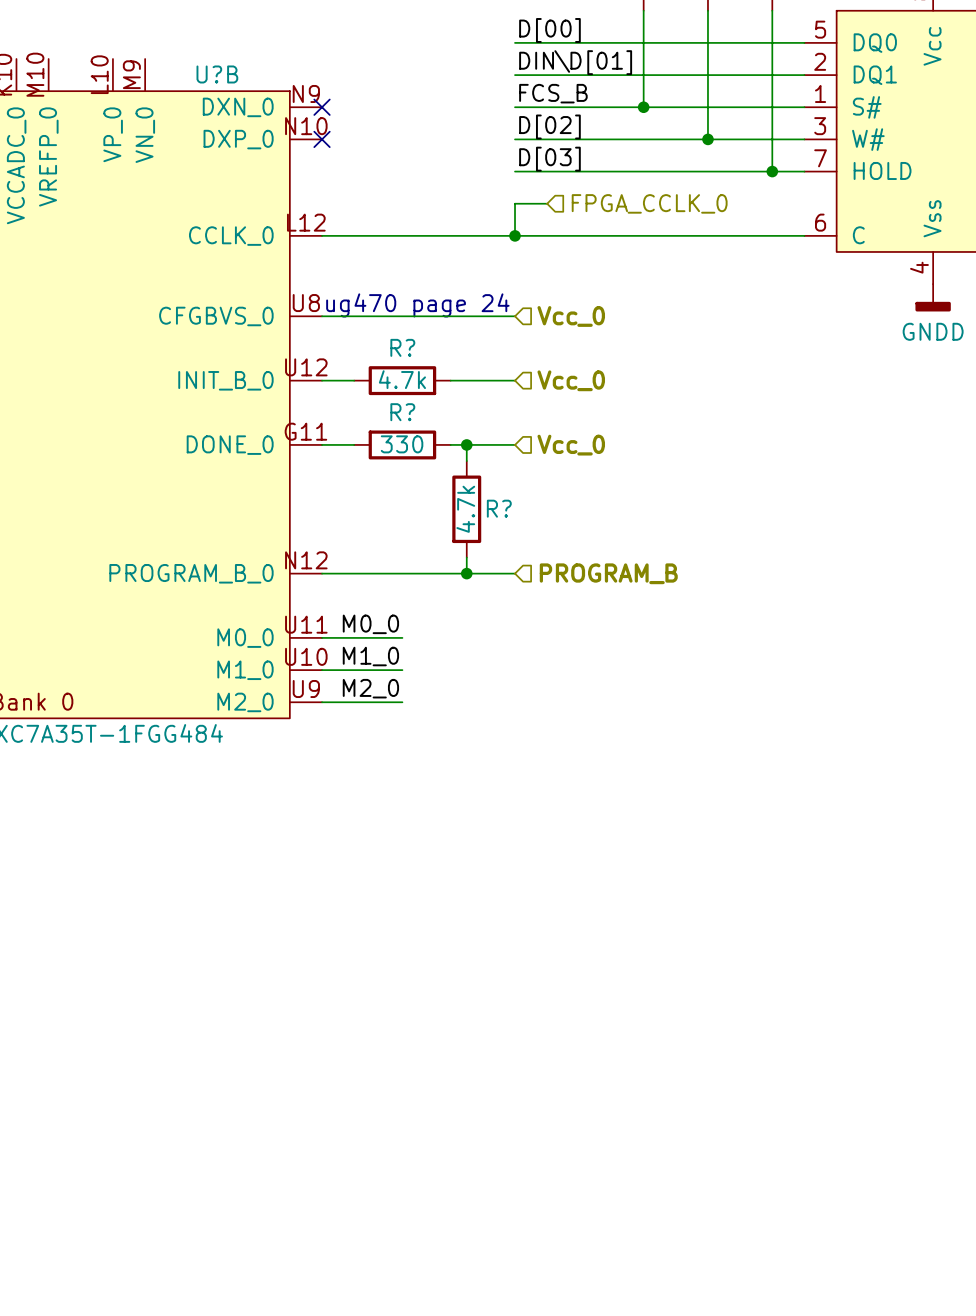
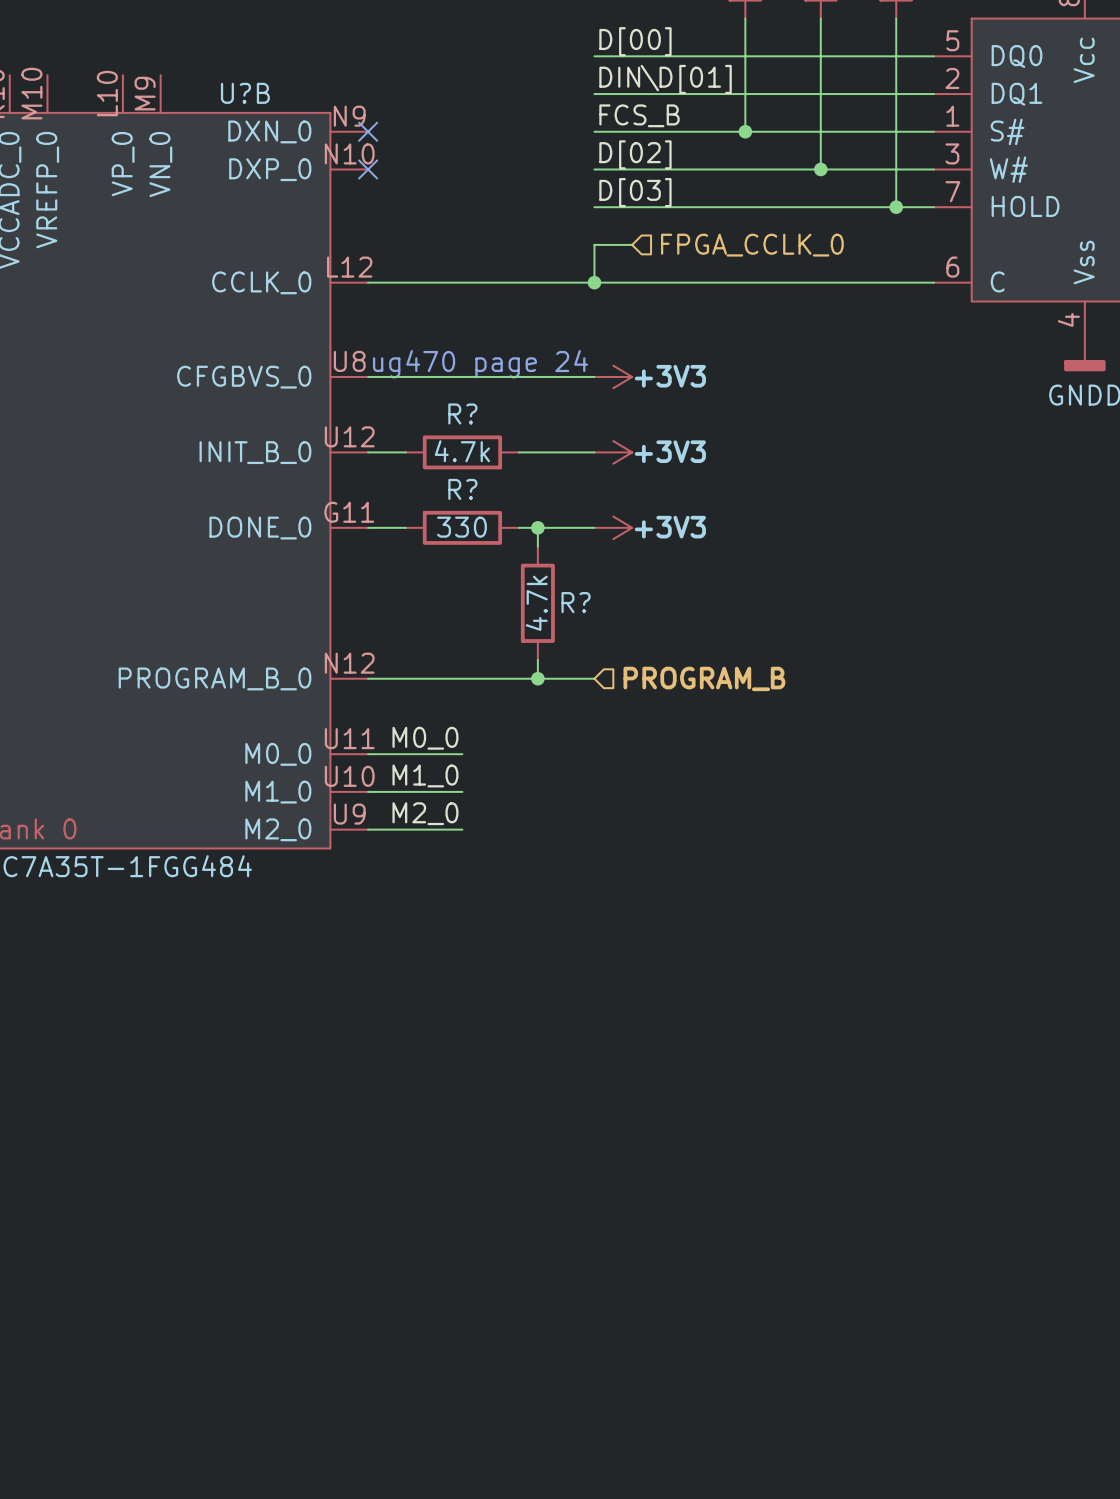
power symbol: none -> +3V3 (613, 376)
hierarchical label: Vcc_0 (571, 316) -> none
power symbol: none -> +3V3 (613, 452)
hierarchical label: Vcc_0 (571, 380) -> none
power symbol: none -> +3V3 (613, 527)
hierarchical label: Vcc_0 (571, 445) -> none

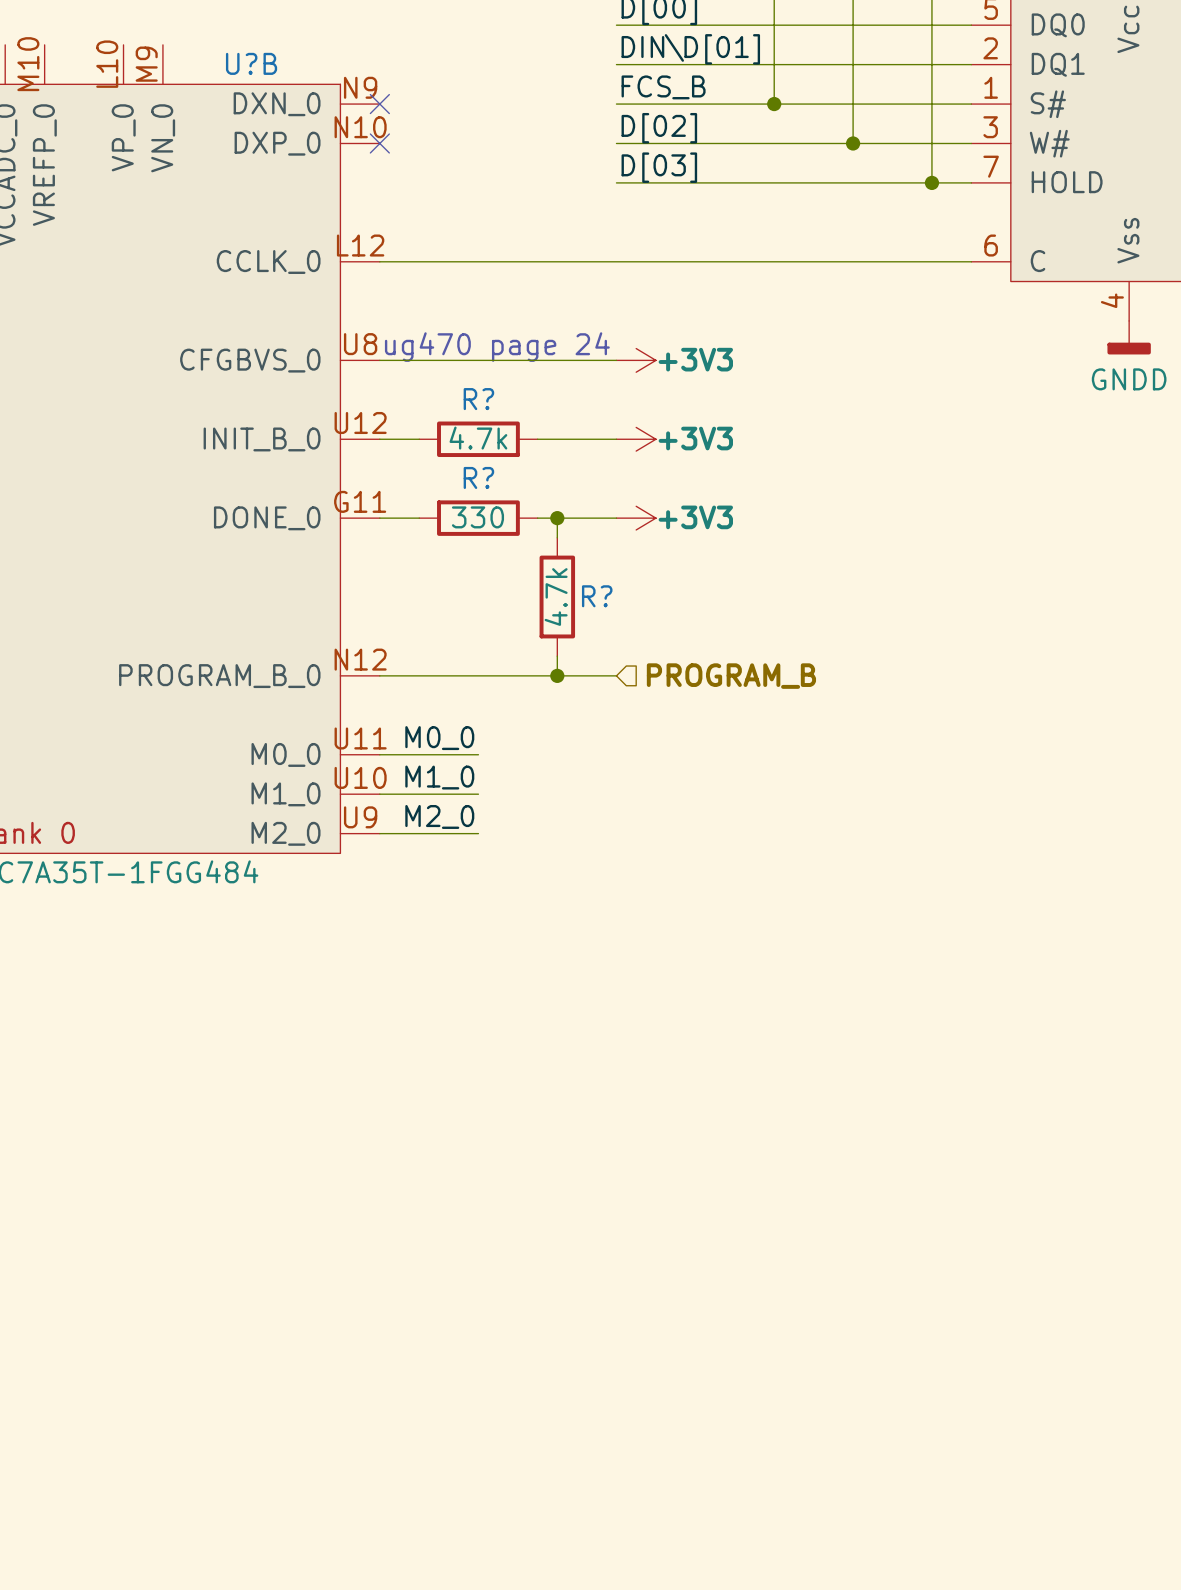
wire: (632, 244) (594, 244) (594, 282) -> none
hierarchical label: FPGA_CCLK_0 (752, 245) -> none
junction: (594, 282) -> none

